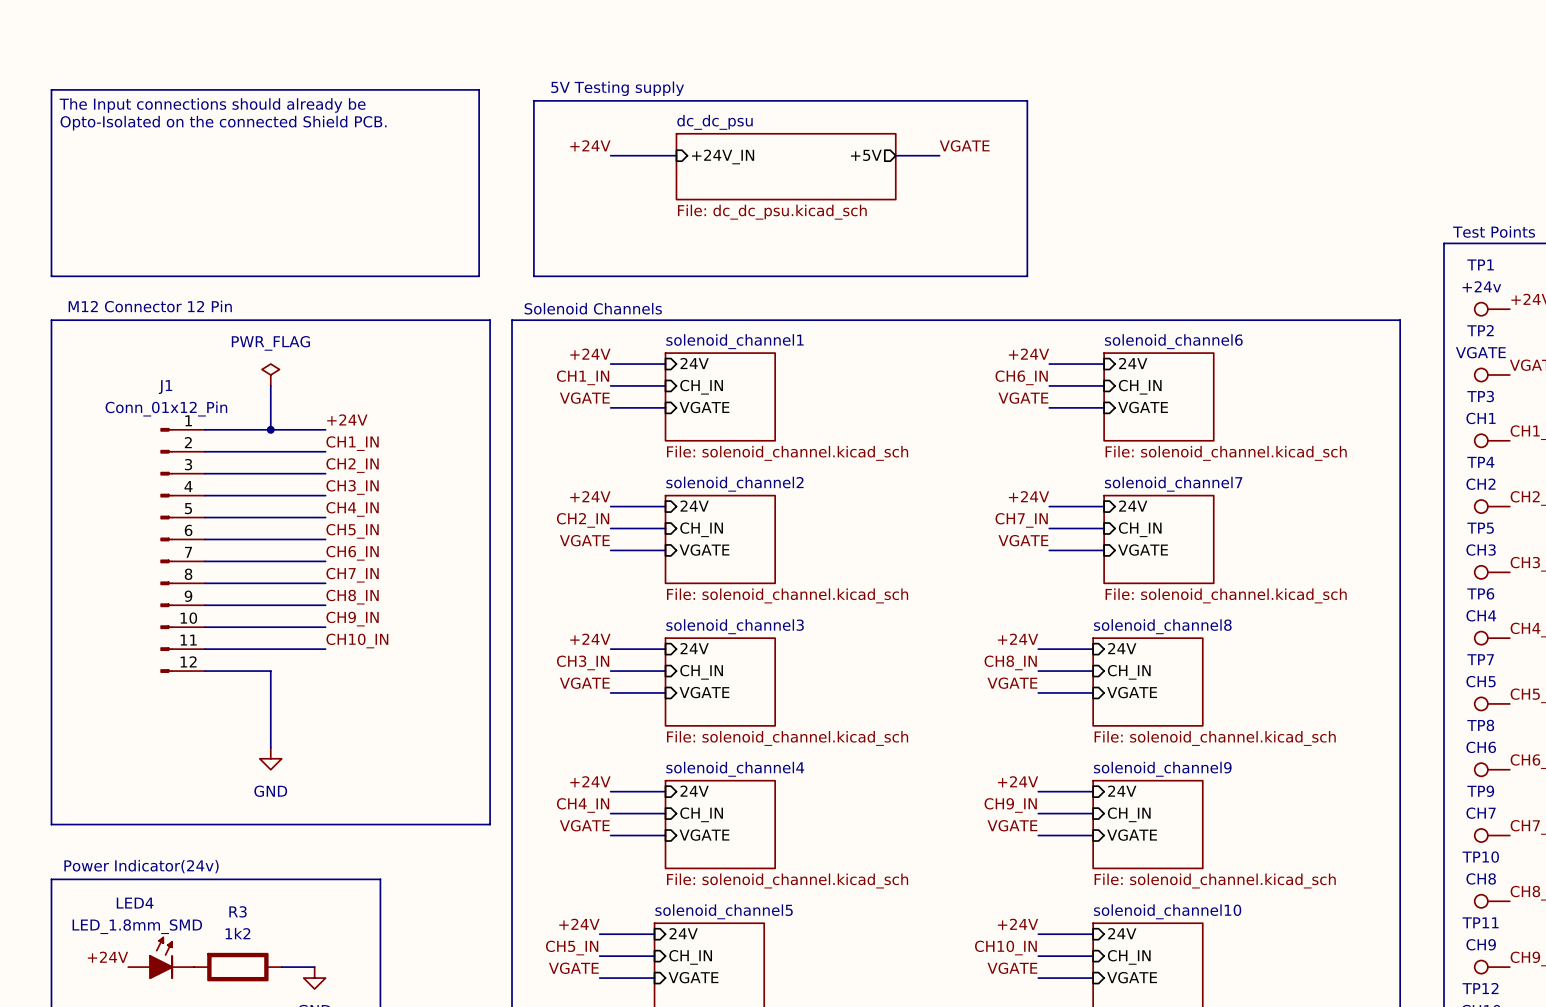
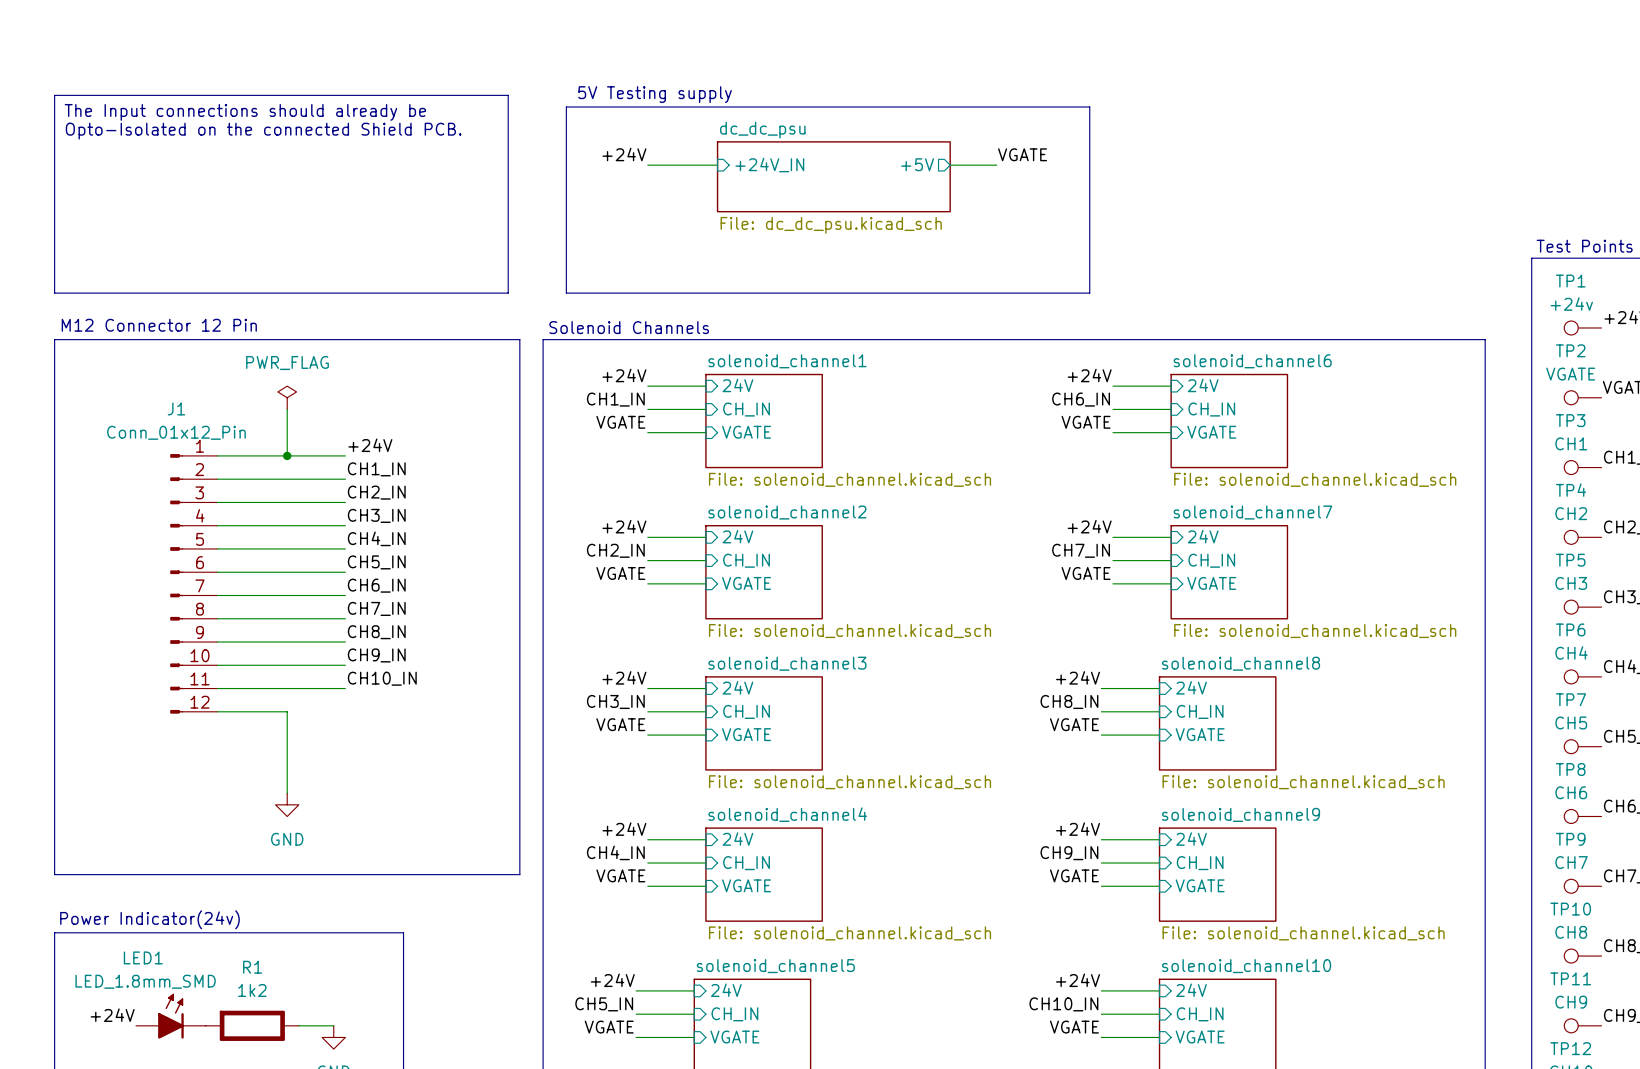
LED4 name: LED4 (135, 903) -> LED1 (143, 957)
R3 name: R3 (238, 911) -> R1 (252, 967)

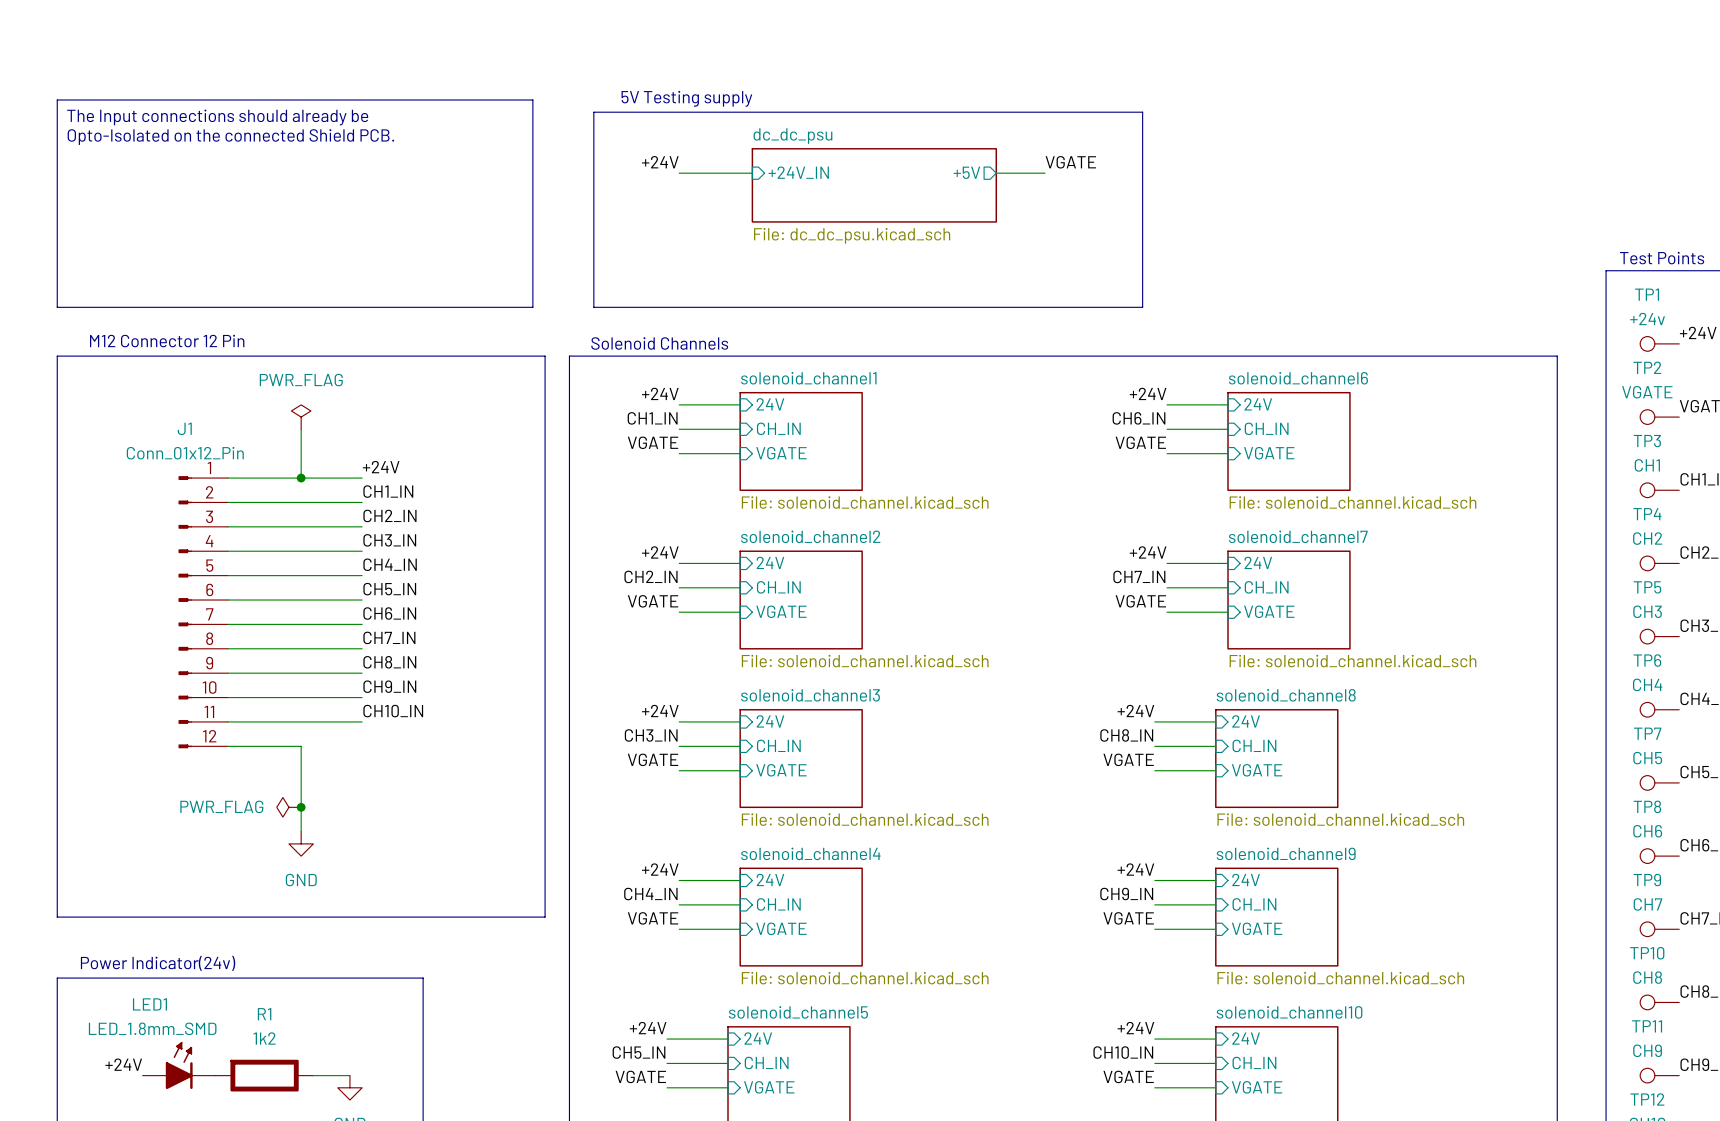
power symbol: none -> PWR_FLAG (288, 807)
junction: none -> (301, 807)

